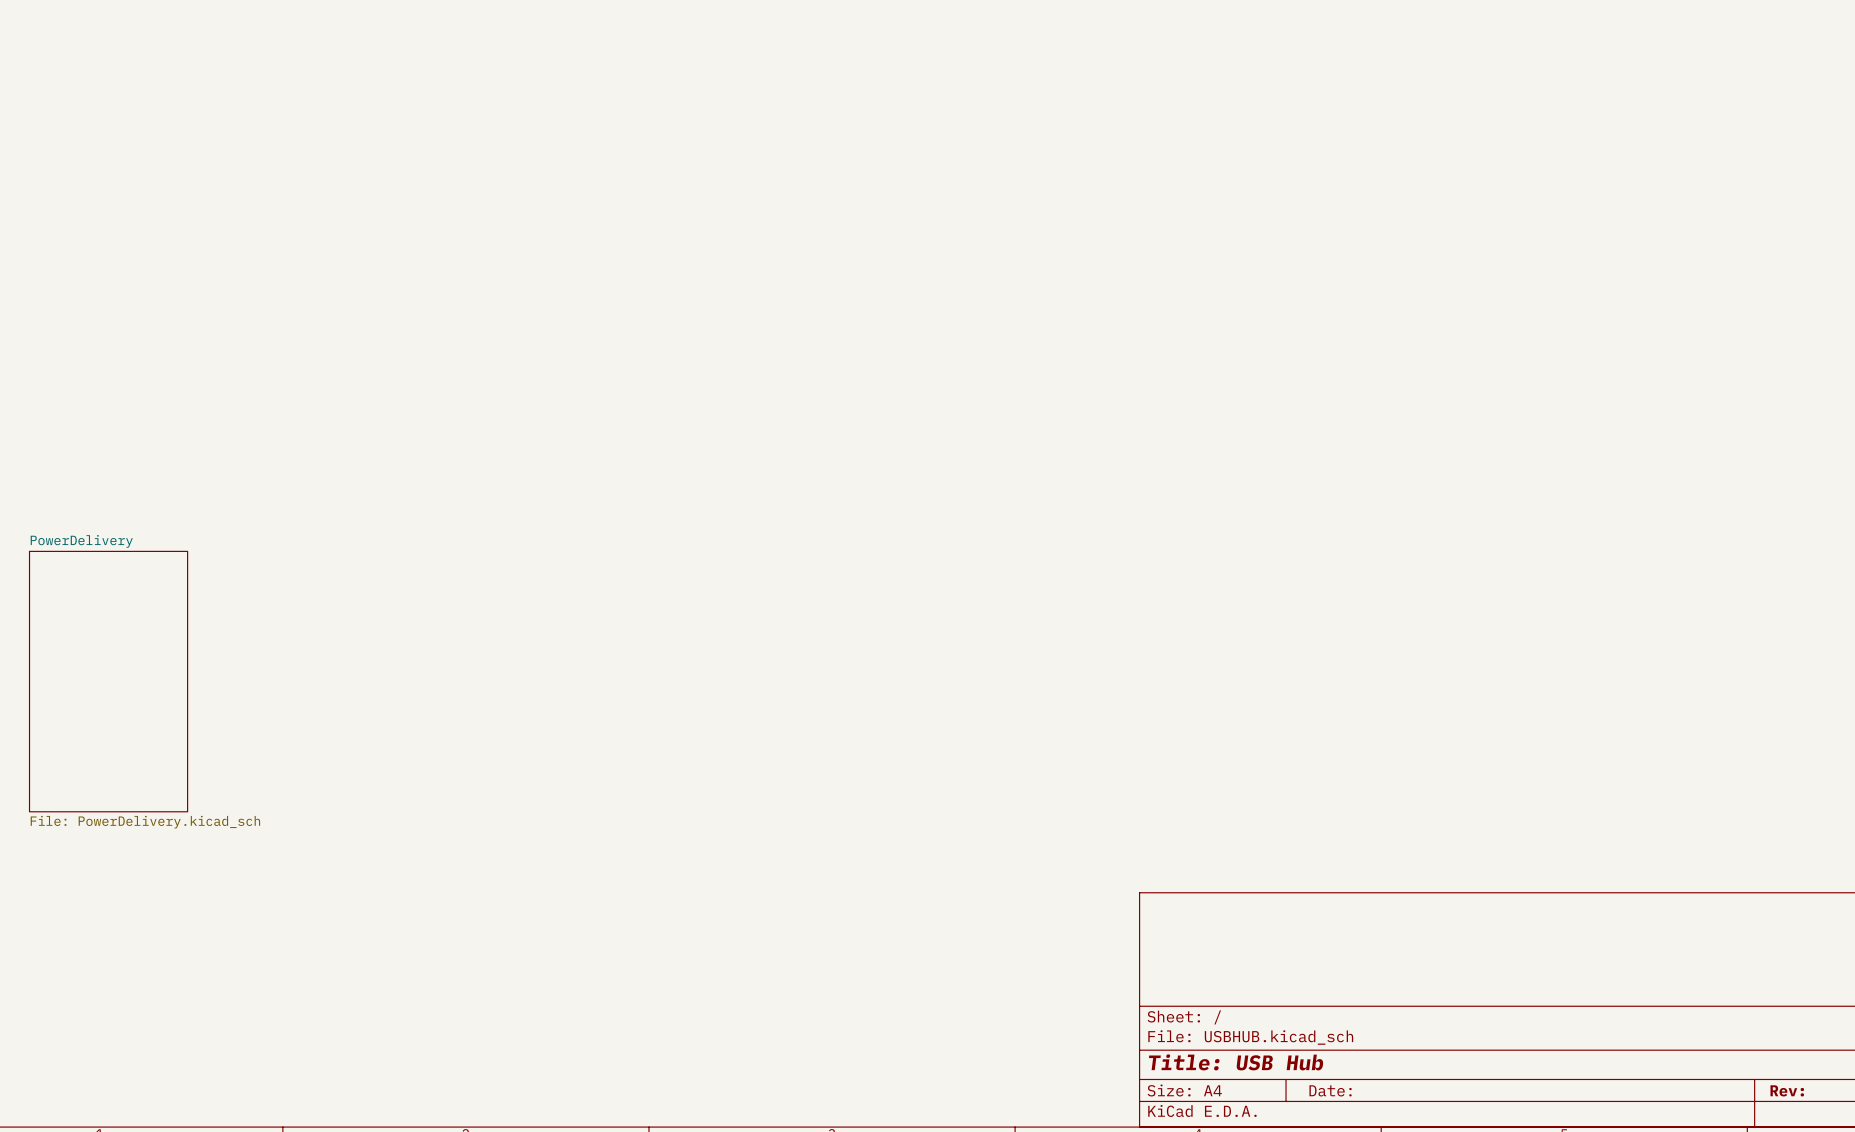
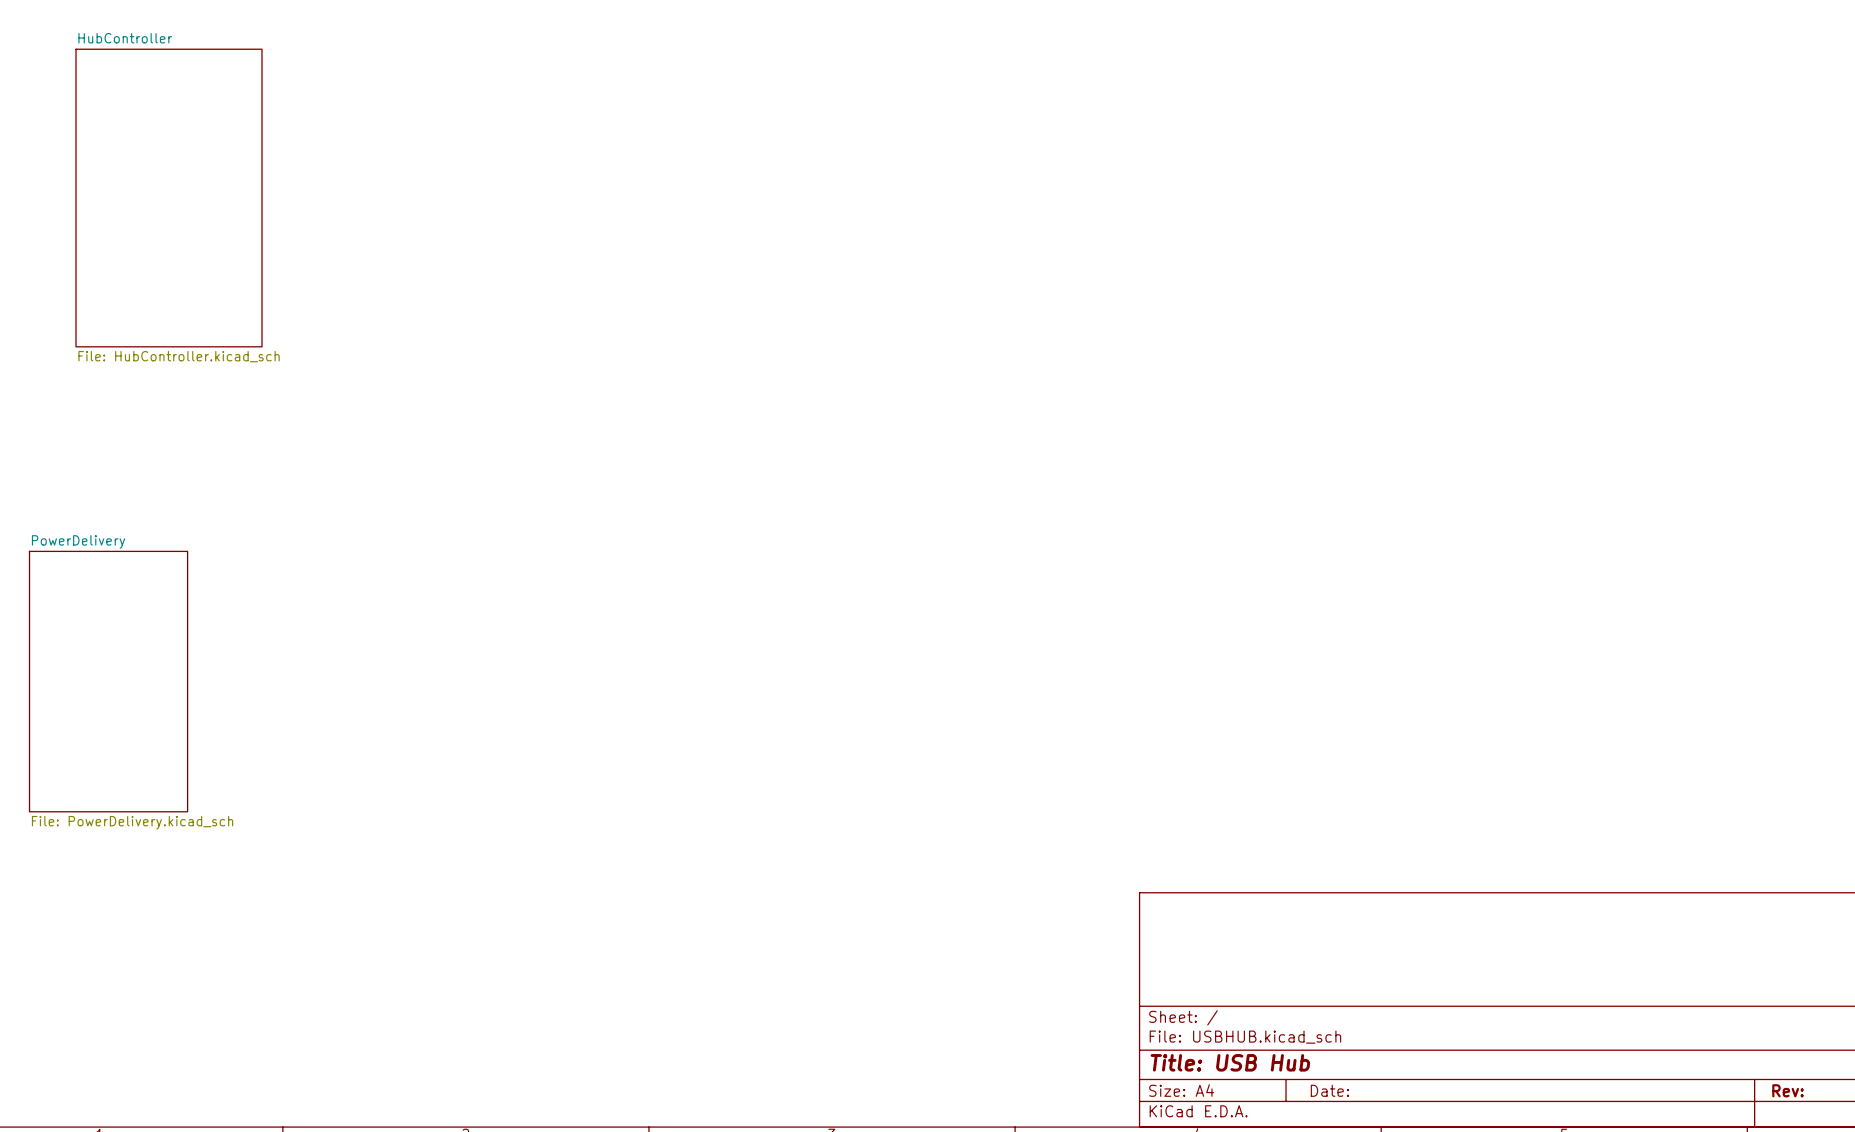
sheet HubController: none -> File: HubController.kicad_sch (169, 198)

